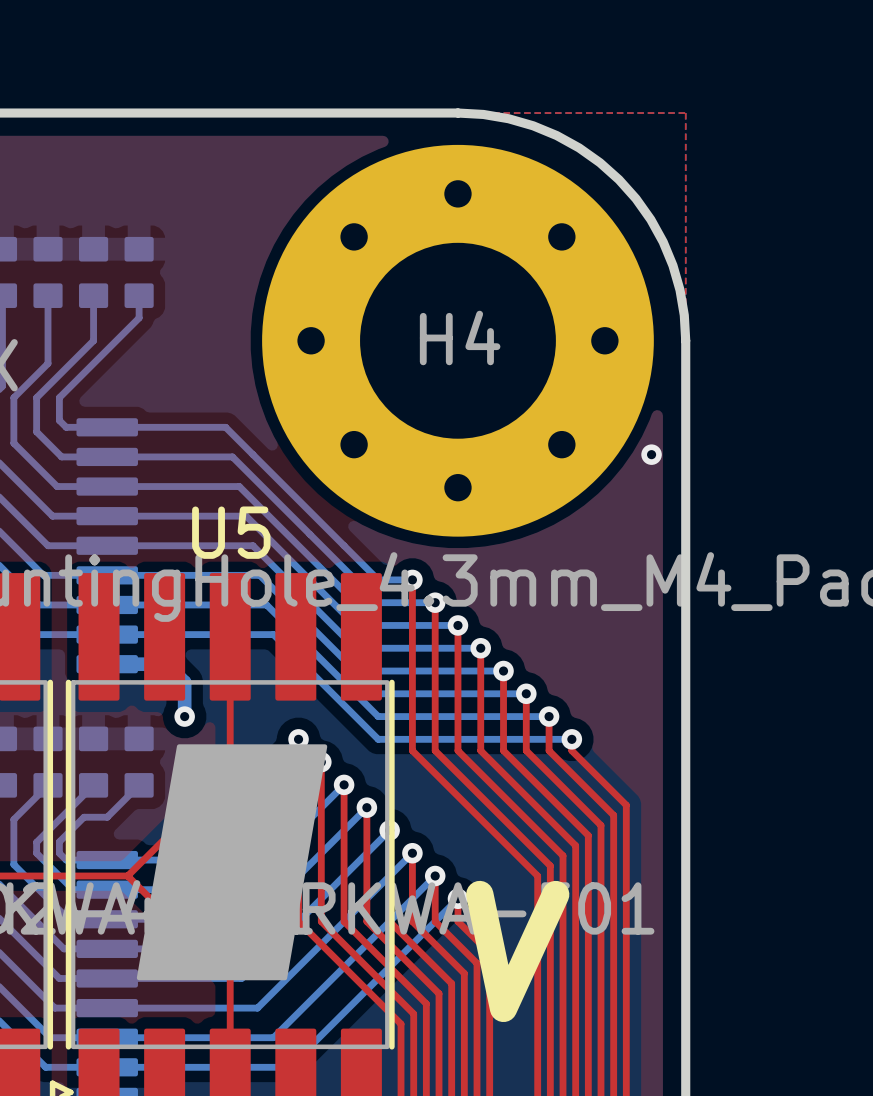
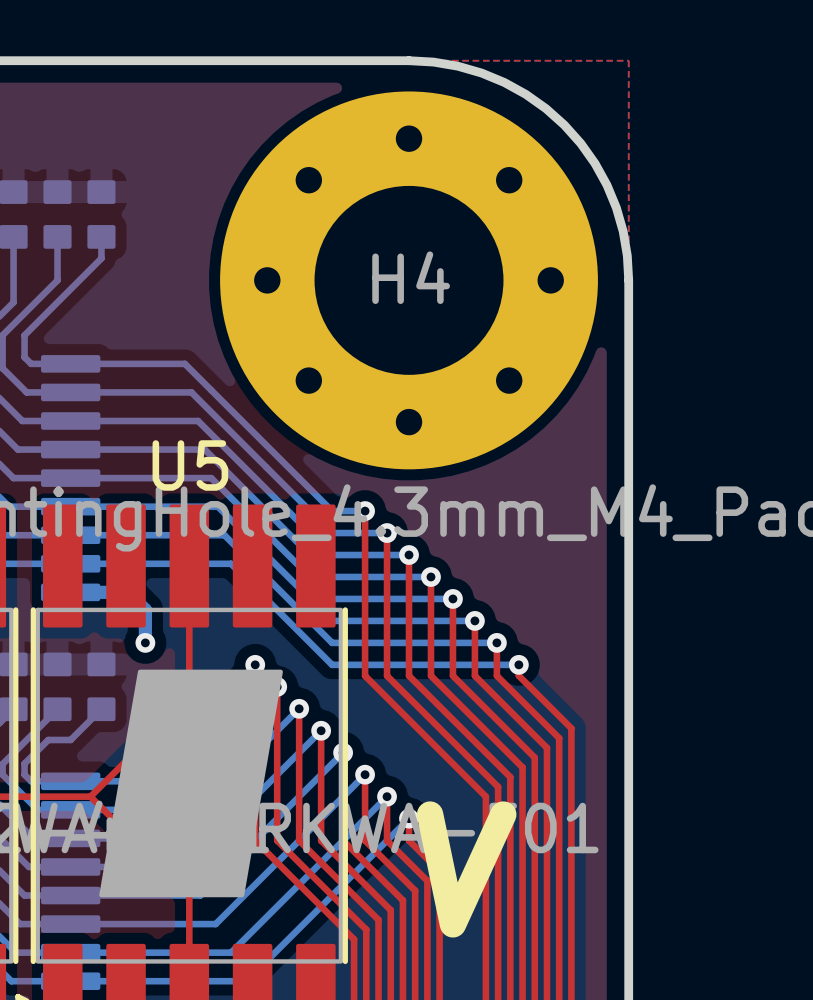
via: (651, 454) -> none

